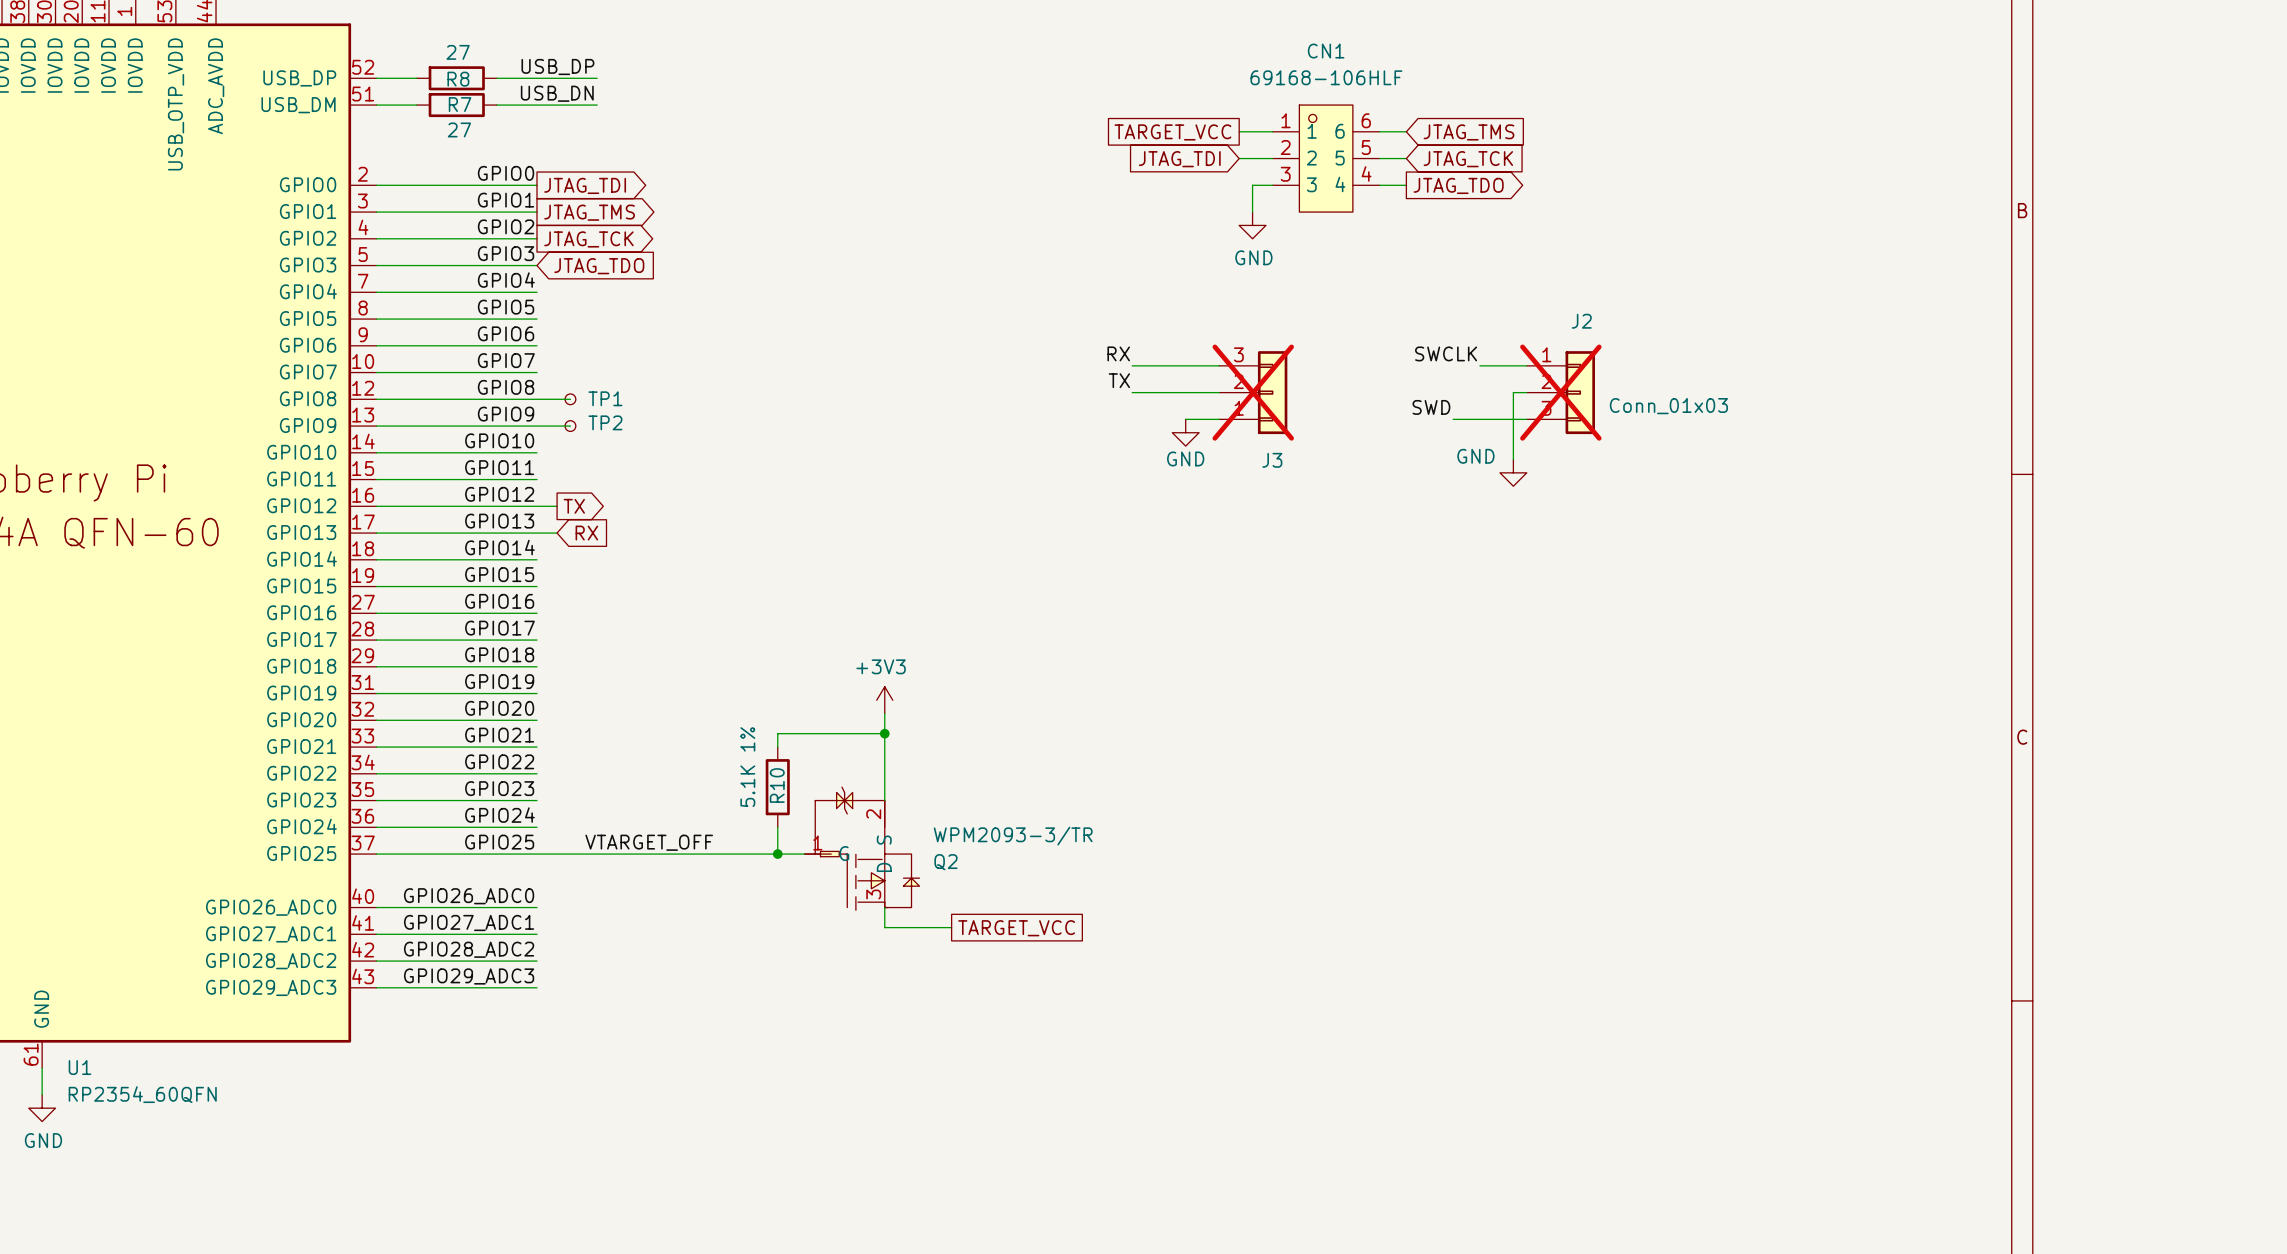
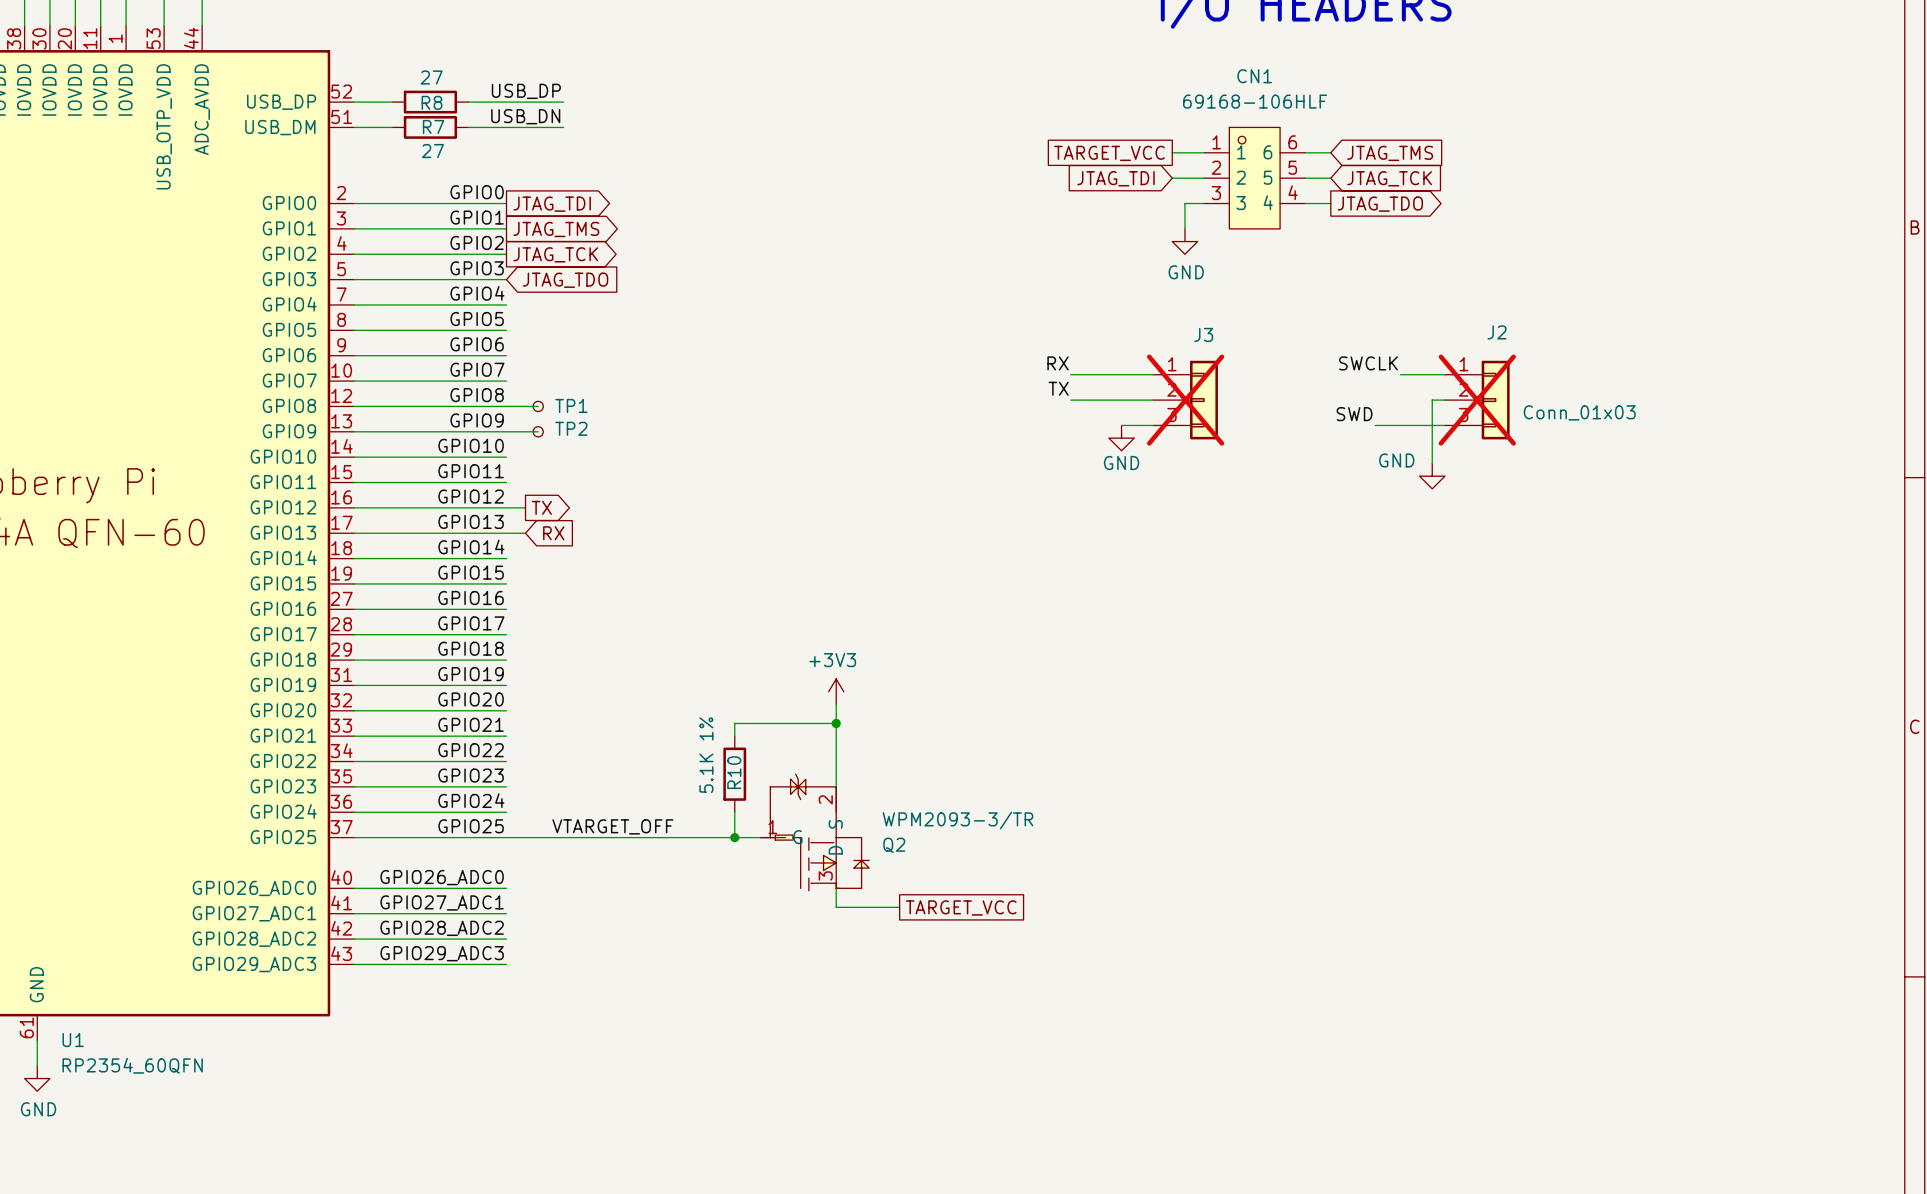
J3 flip: as is (1272, 392) -> up-down (1203, 400)

